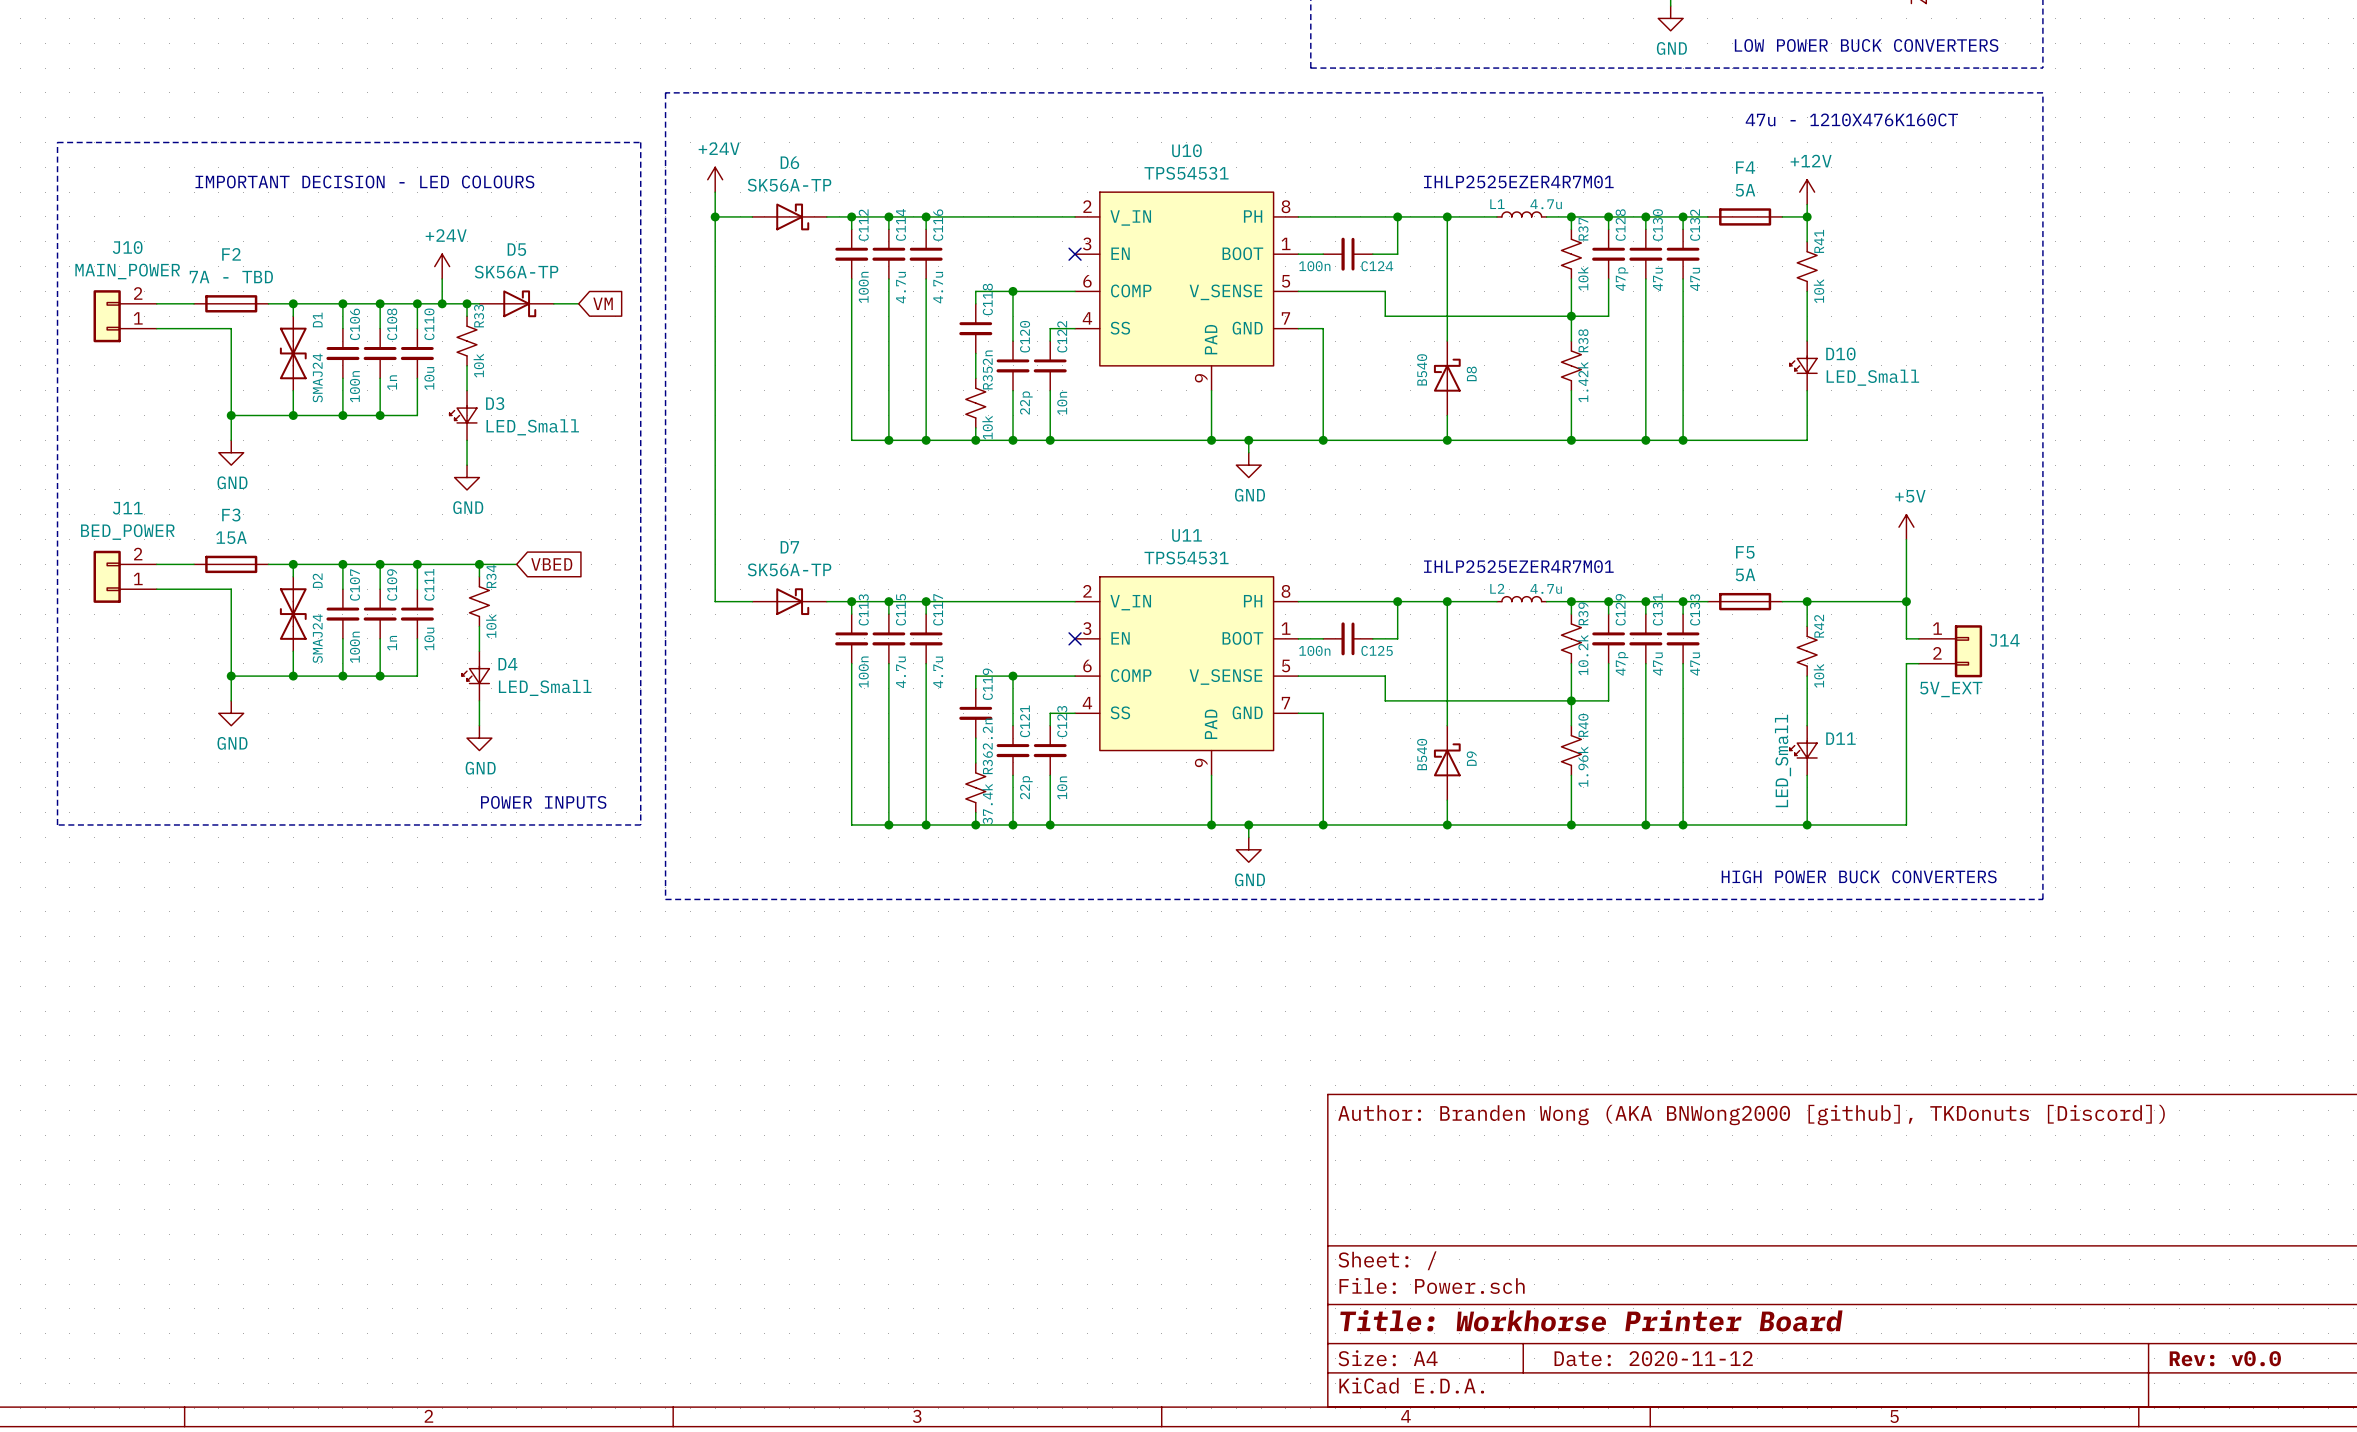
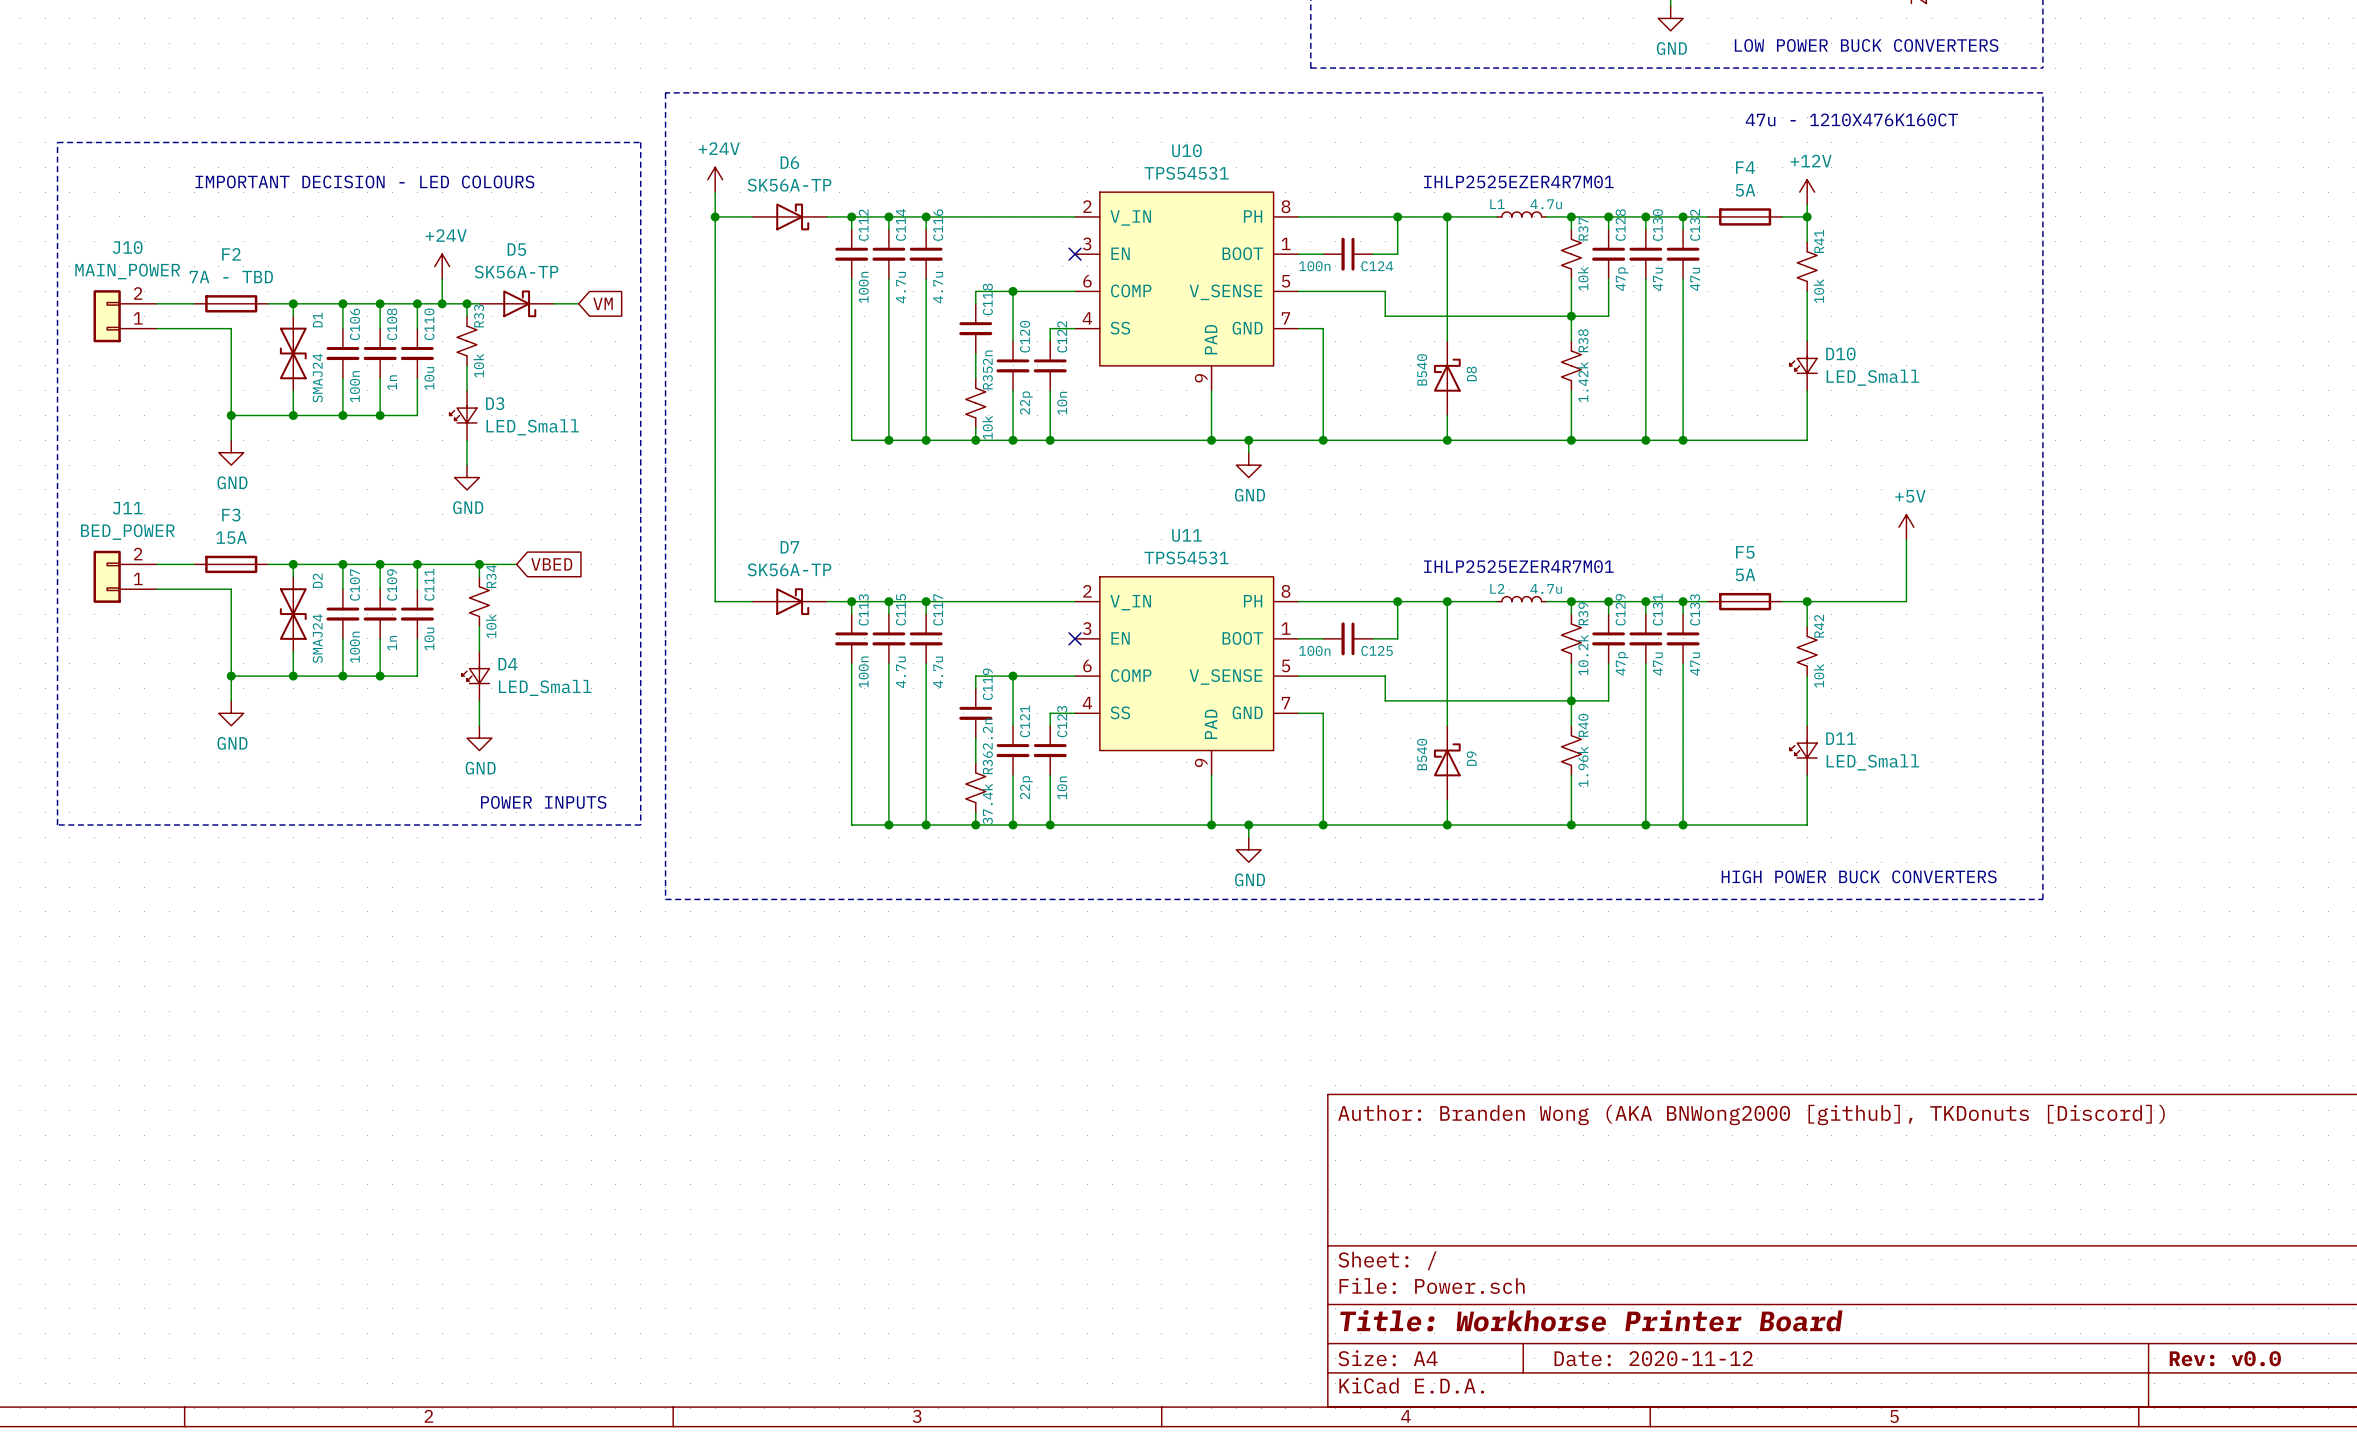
wire: (1906, 601) (1906, 638) (1918, 638) -> none
junction: (1906, 601) -> none
J14: 5V_EXT (1950, 651) -> none
wire: (1918, 663) (1906, 663) (1906, 824) (1807, 824) -> none
D11 value rotation: 0° (1783, 760) -> 90° clockwise (1872, 762)
junction: (1807, 824) -> none

